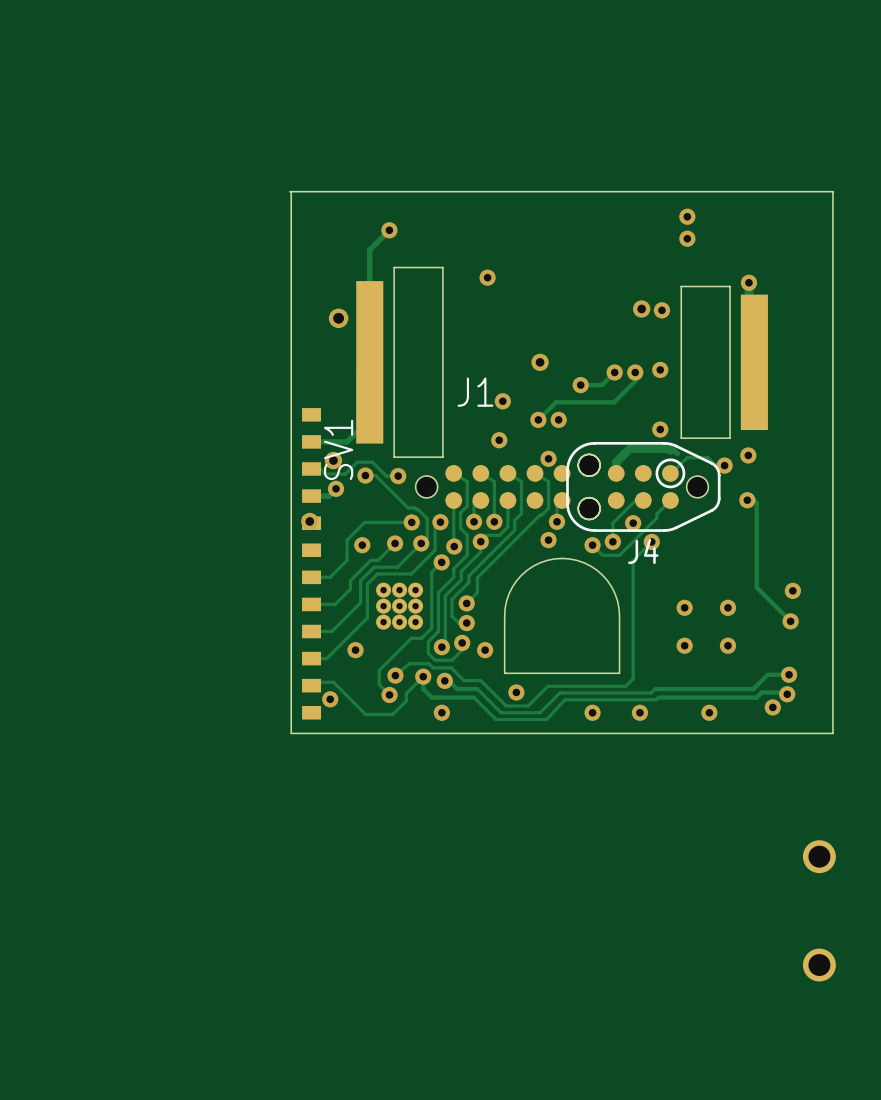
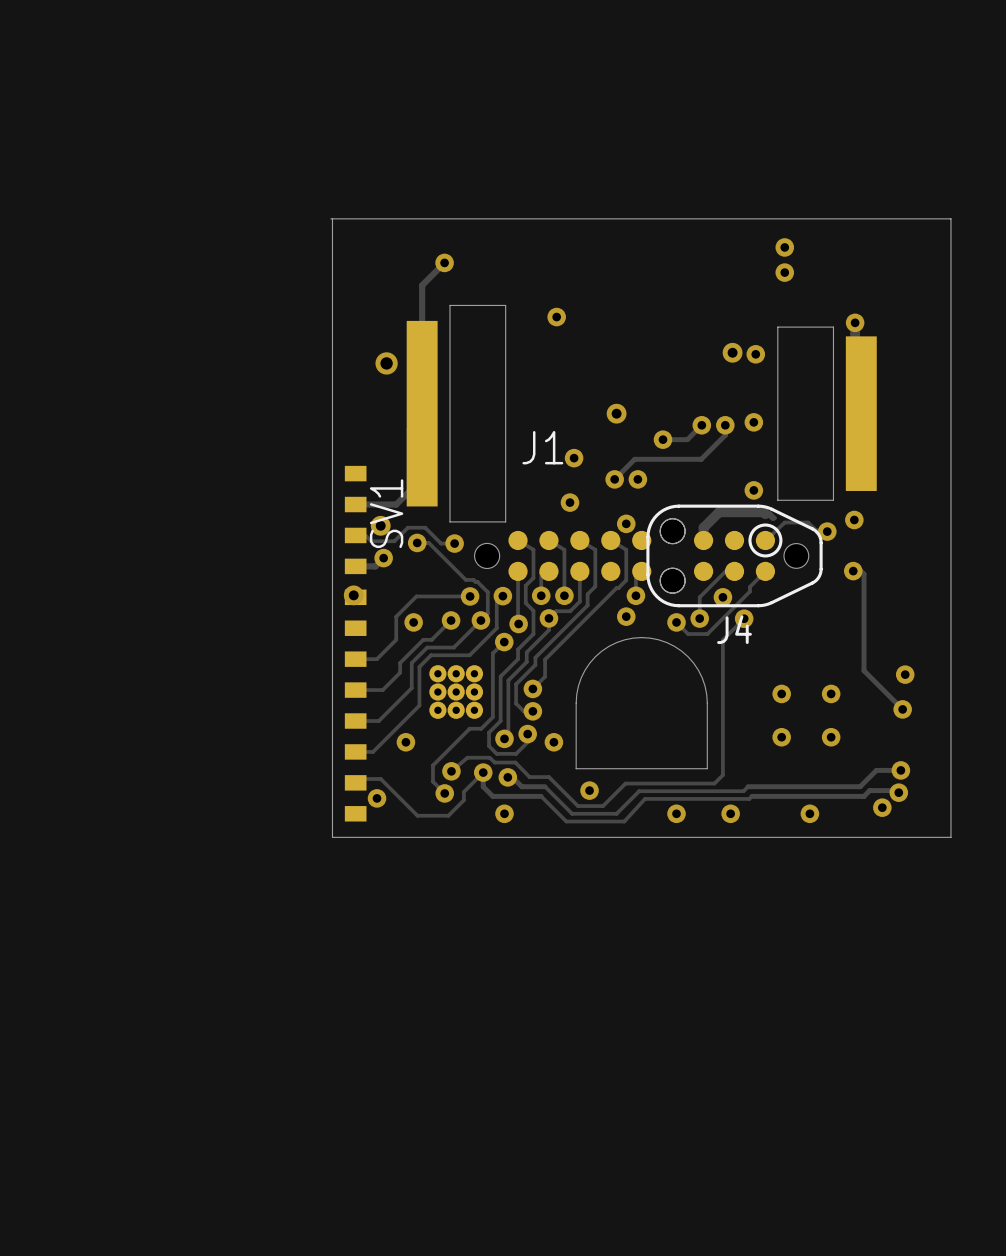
part: (819, 856) -> none
part: (819, 965) -> none

